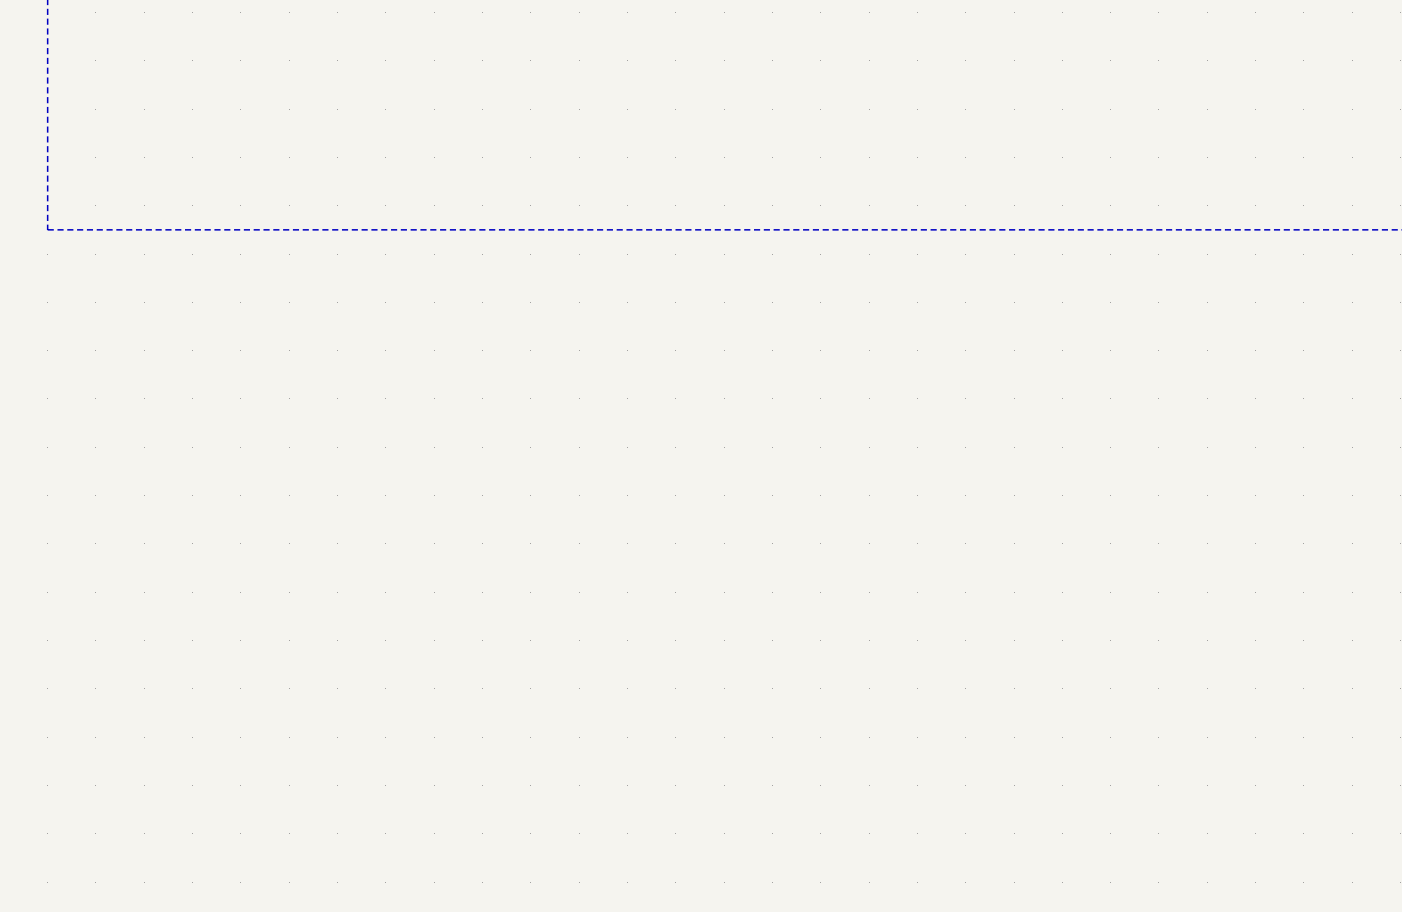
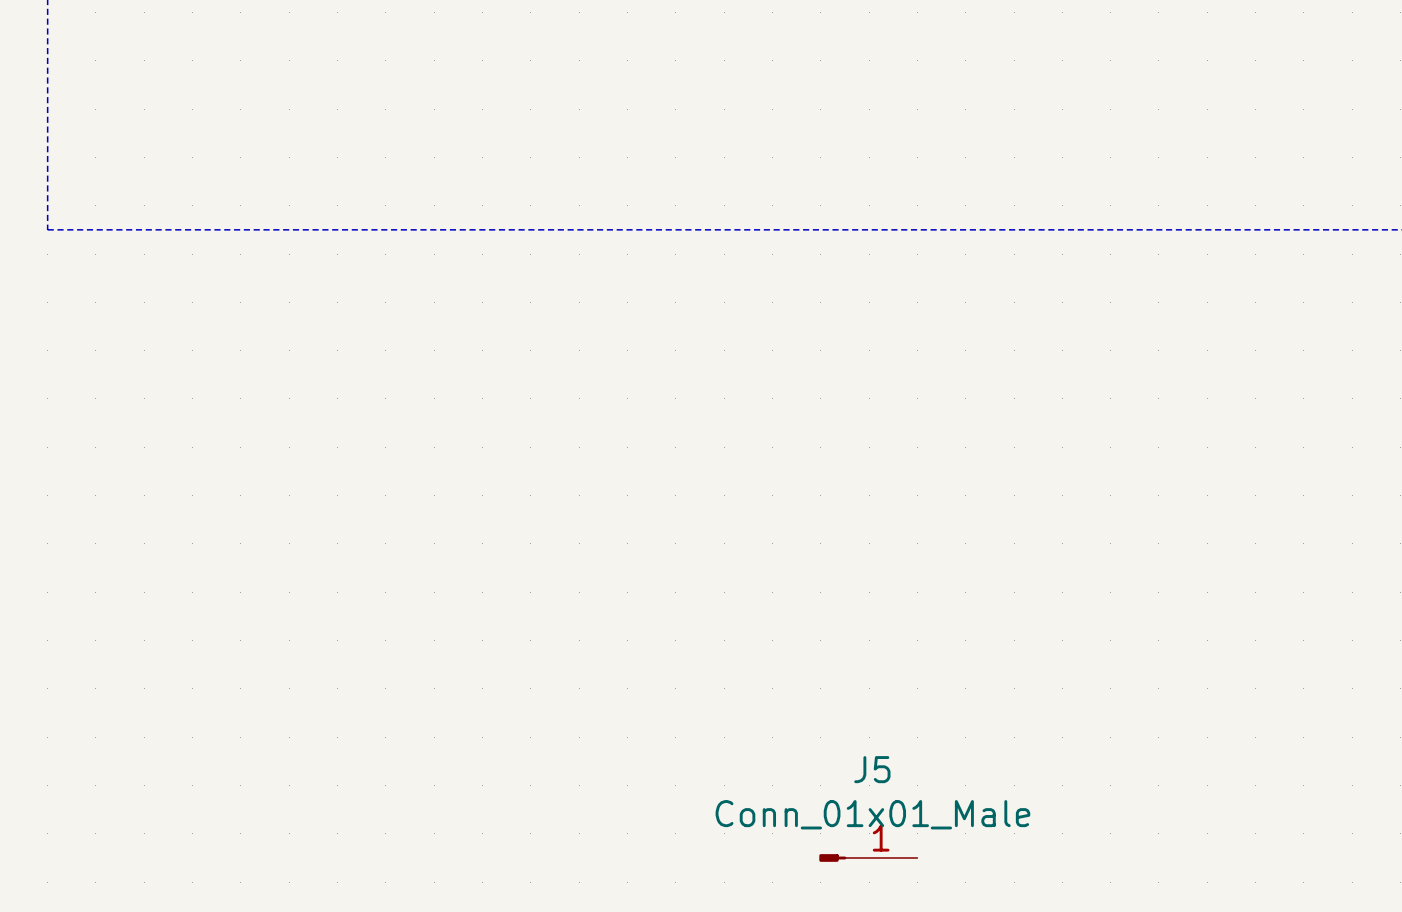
J5: none -> Conn_01x01_Male (868, 857)

